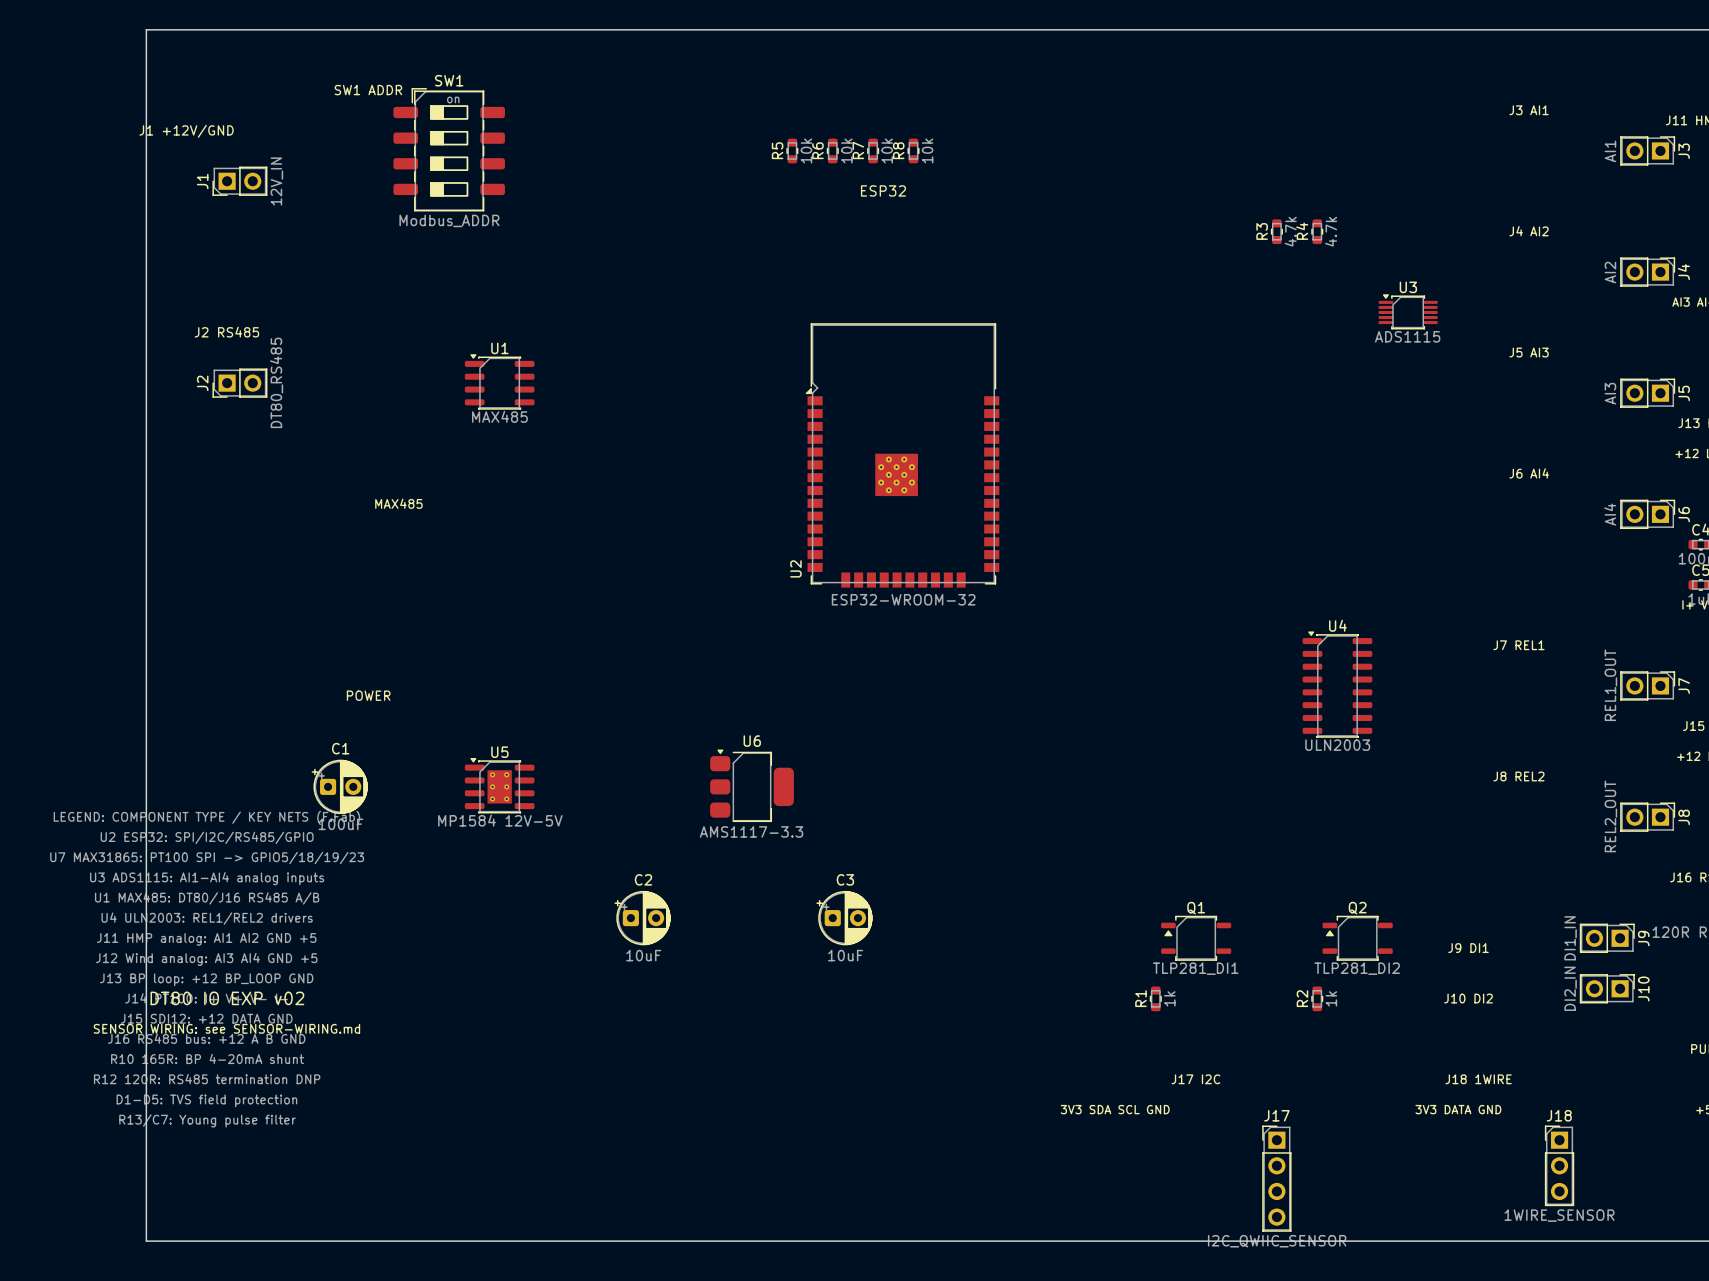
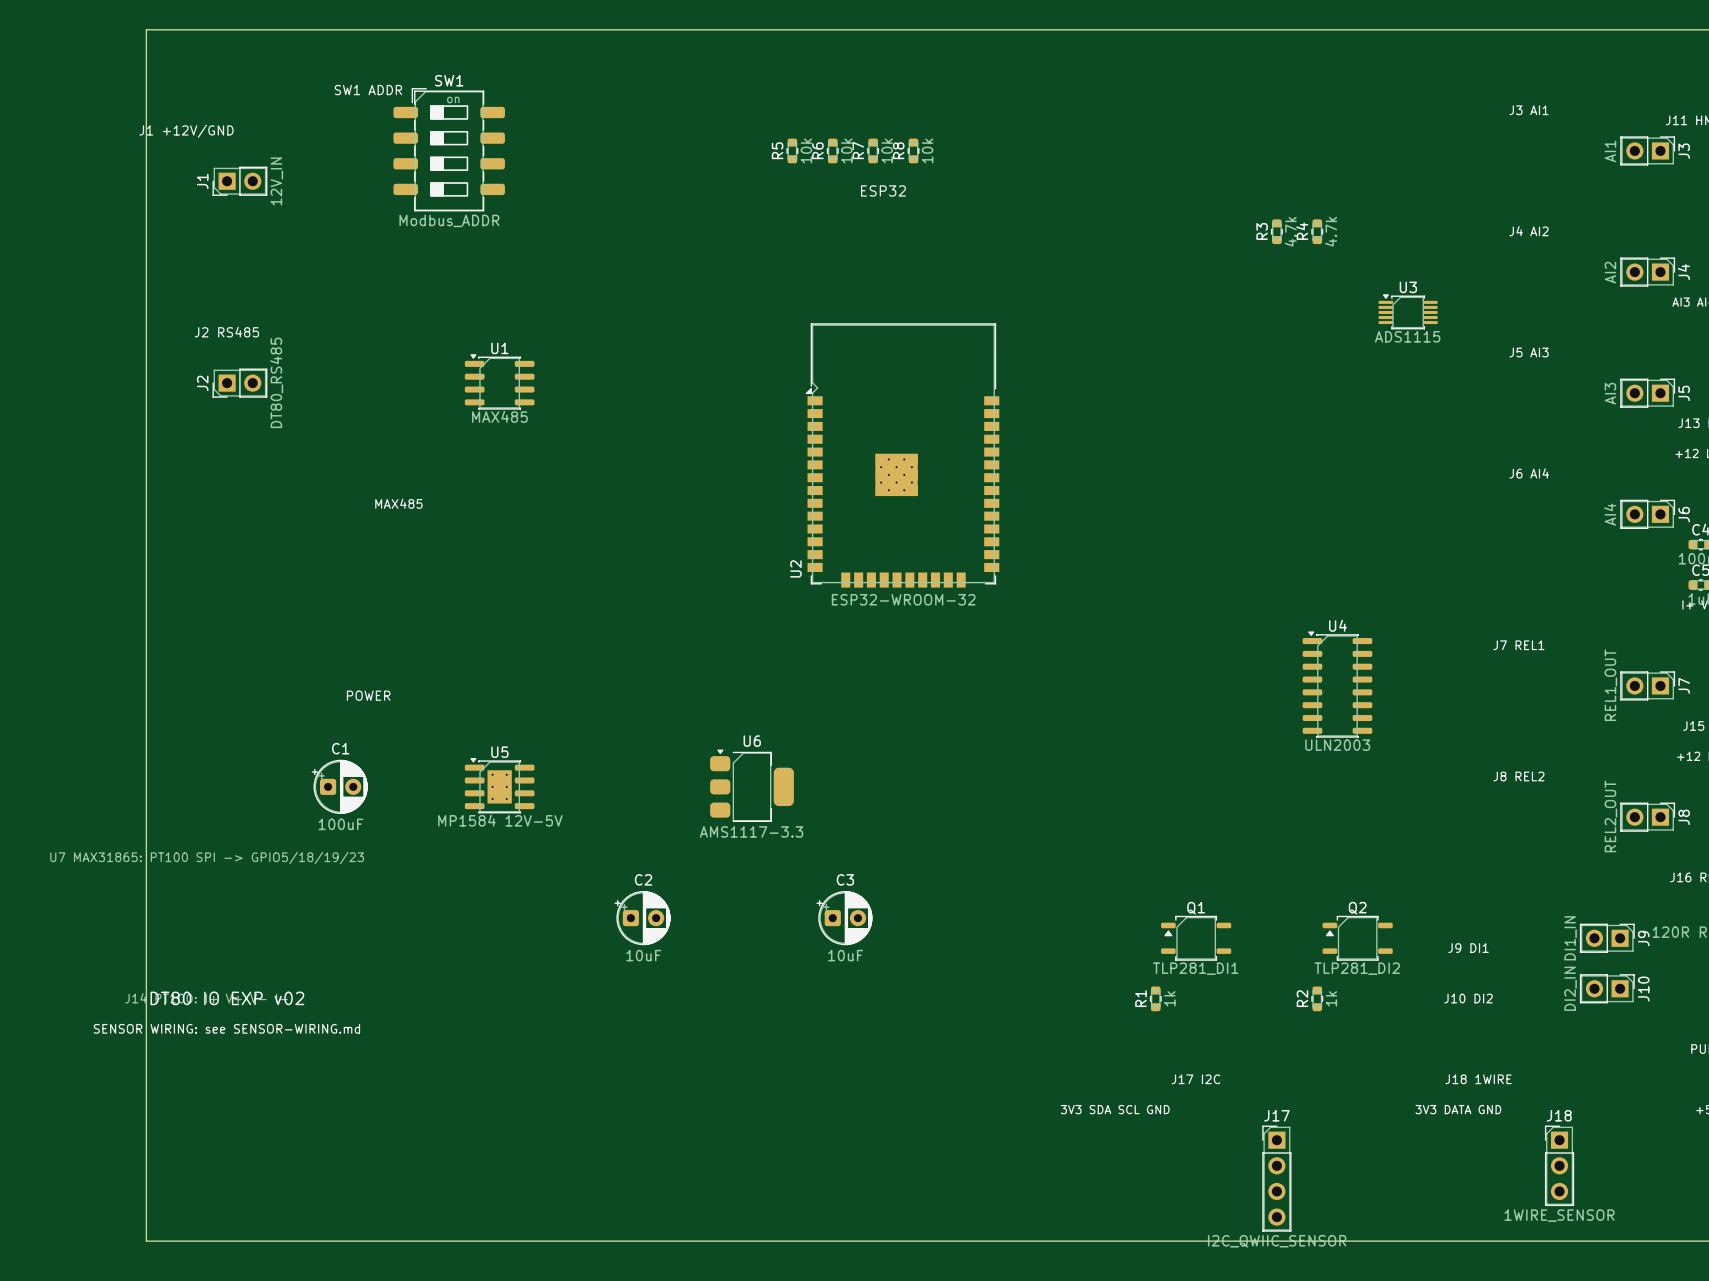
text: LEGEND: COMPONENT TYPE / KEY NETS (F.Fab) (206, 817) -> none
text: U2 ESP32: SPI/I2C/RS485/GPIO (207, 837) -> none
text: U3 ADS1115: AI1-AI4 analog inputs (207, 878) -> none
text: U1 MAX485: DT80/J16 RS485 A/B (207, 898) -> none
text: U4 ULN2003: REL1/REL2 drivers (207, 918) -> none
text: J11 HMP analog: AI1 AI2 GND +5 (206, 939) -> none
text: J12 Wind analog: AI3 AI4 GND +5 (206, 959) -> none
text: J13 BP loop: +12 BP_LOOP GND (206, 979) -> none
text: J15 SDI12: +12 DATA GND (206, 1018) -> none
text: J16 RS485 bus: +12 A B GND (206, 1038) -> none
text: R10 165R: BP 4-20mA shunt (207, 1058) -> none
text: R12 120R: RS485 termination DNP (207, 1079) -> none
text: D1-D5: TVS field protection (206, 1100) -> none
text: R13/C7: Young pulse filter (207, 1120) -> none

